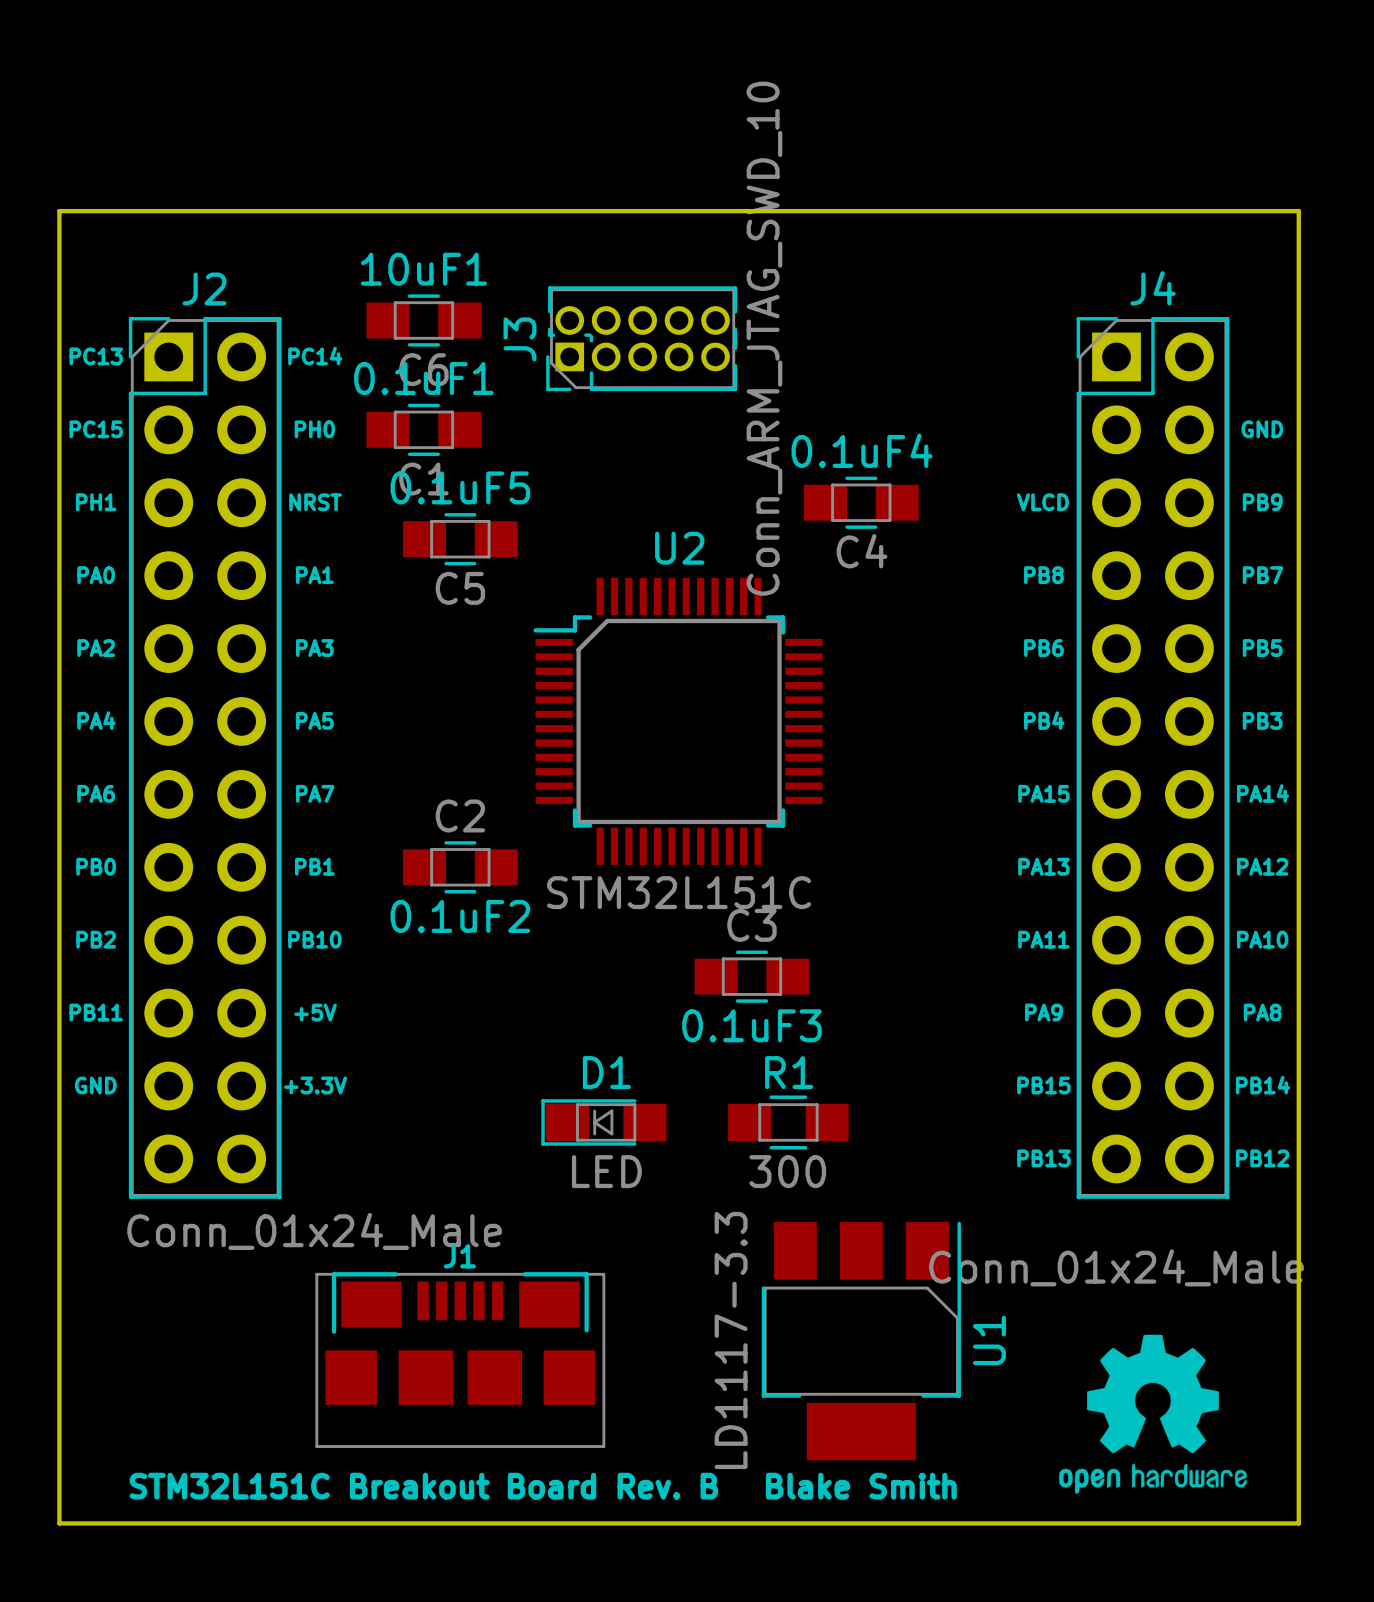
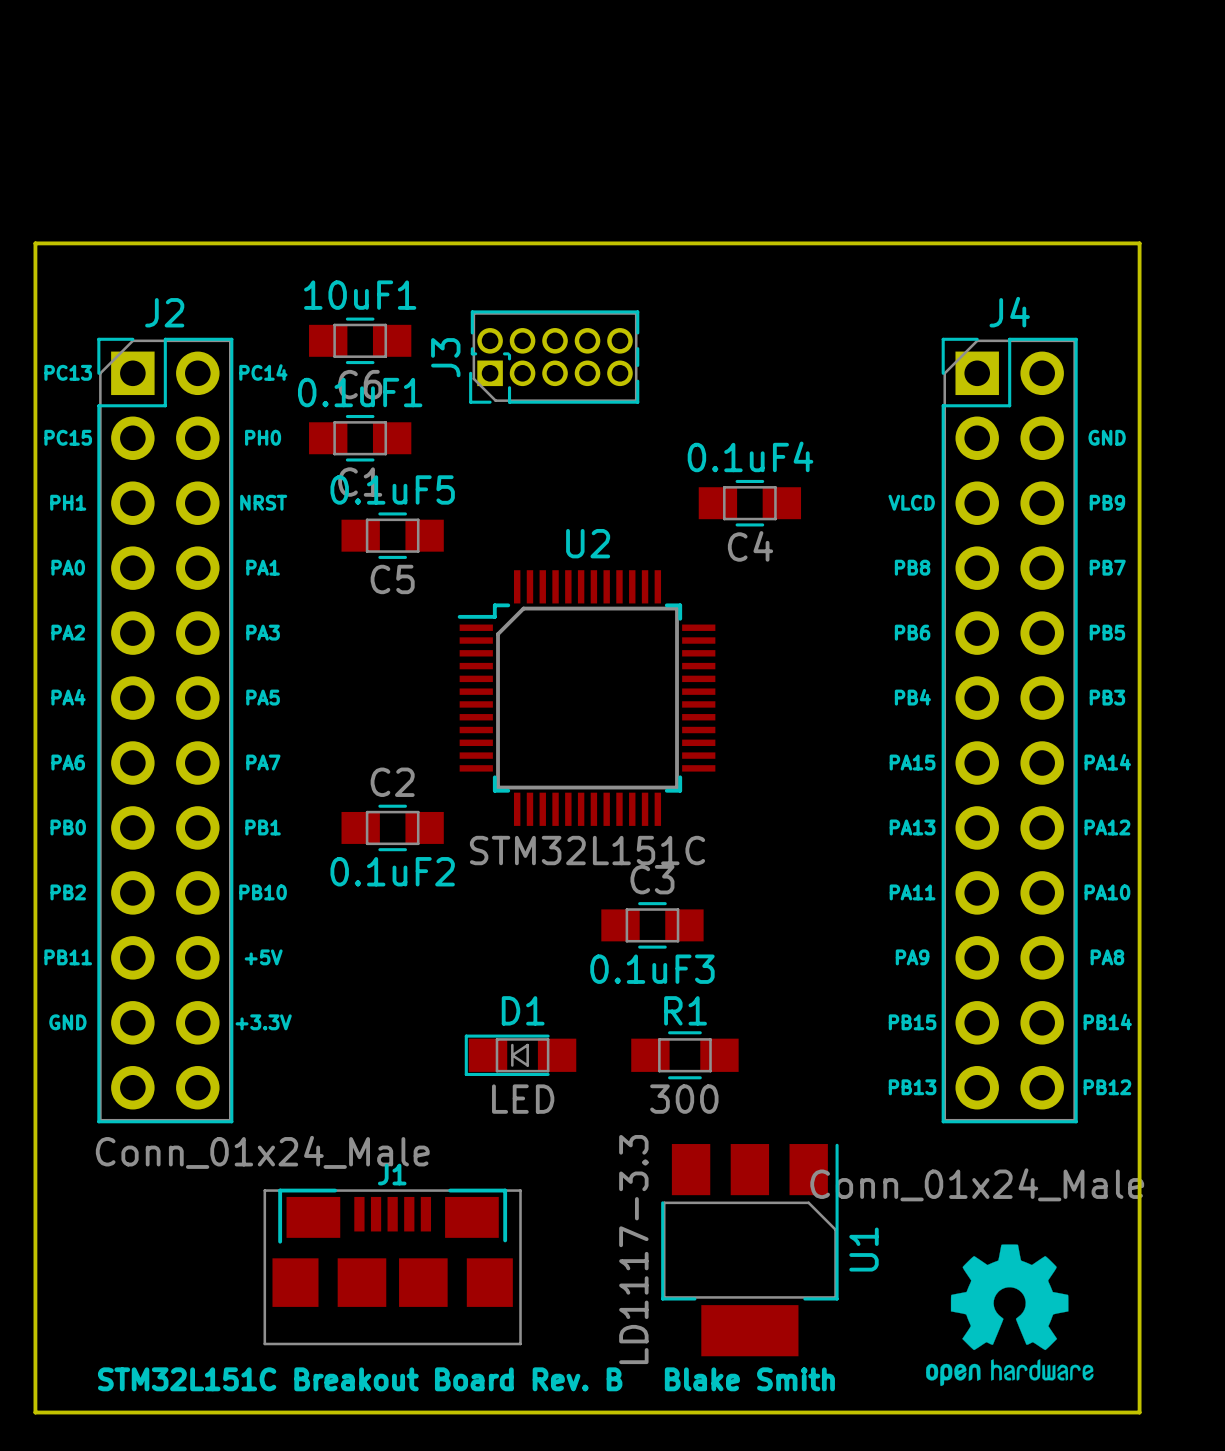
J3 value: Conn_ARM_JTAG_SWD_10 (764, 338) -> none

